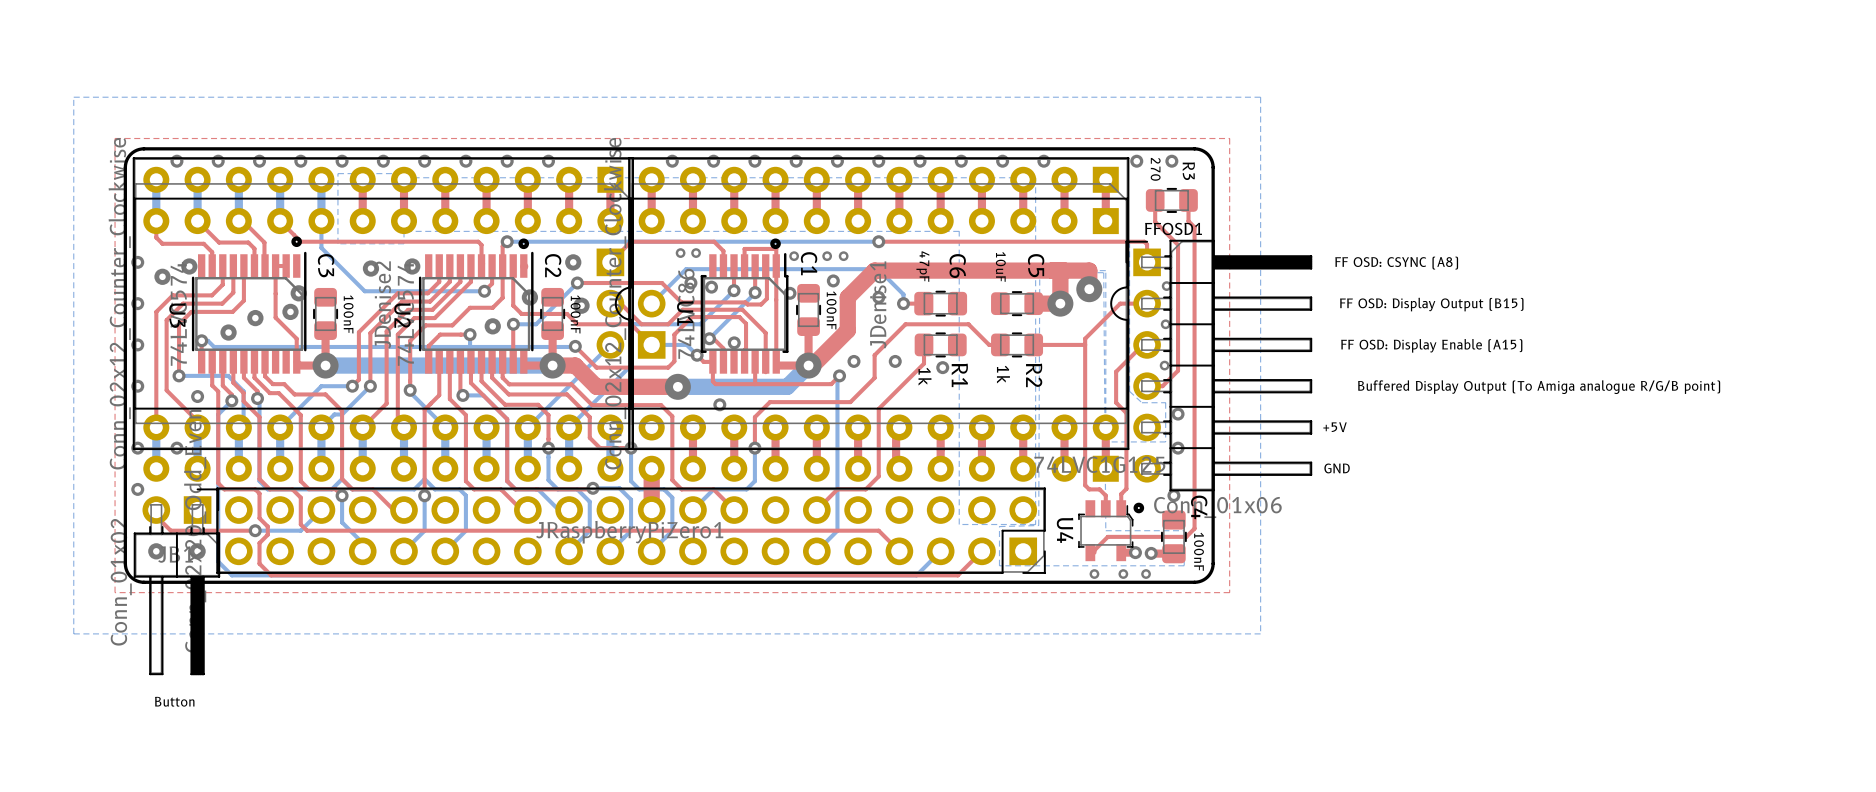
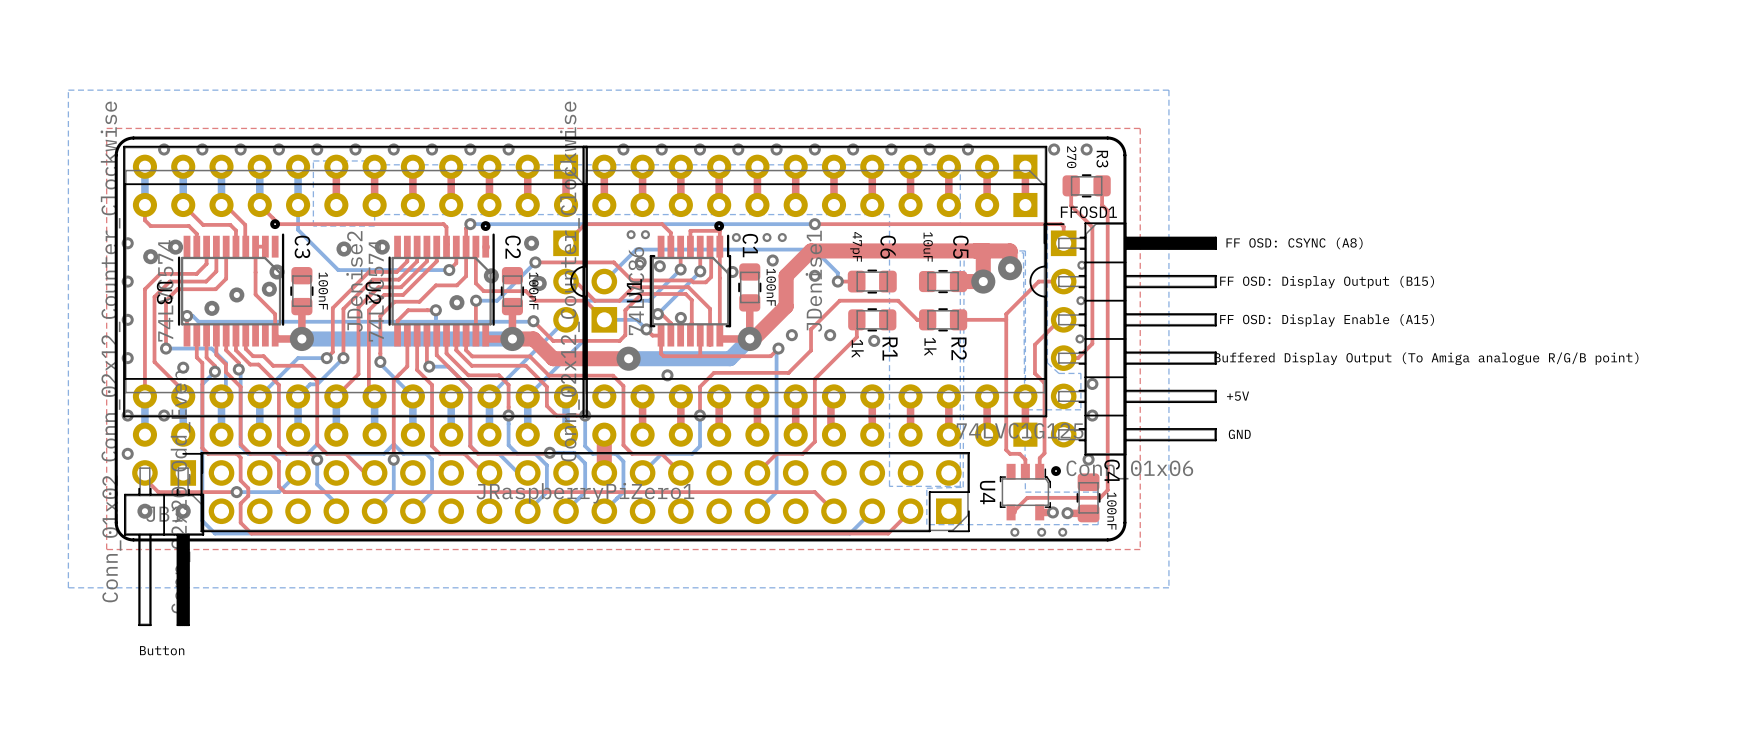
U1 name rotation: 0° (685, 313) -> 180° (634, 290)

